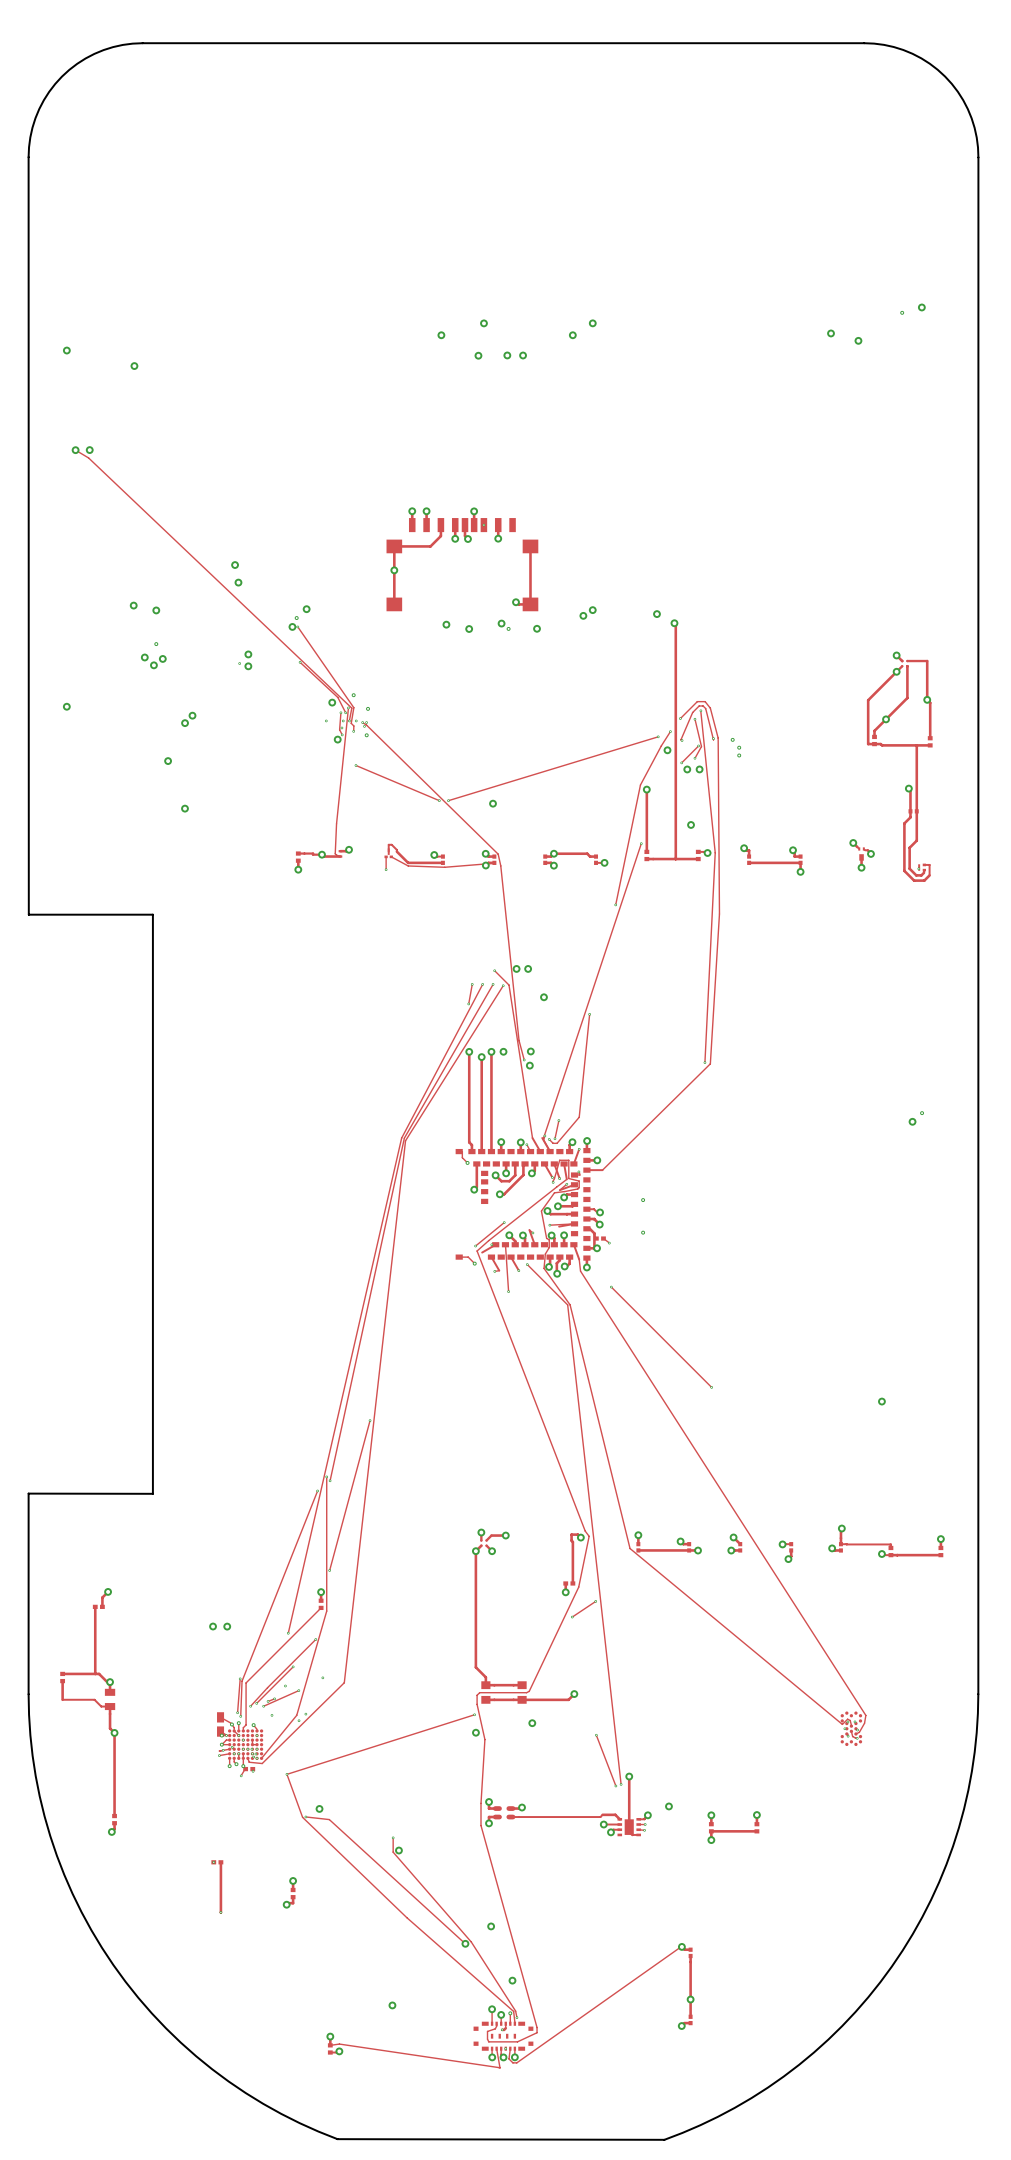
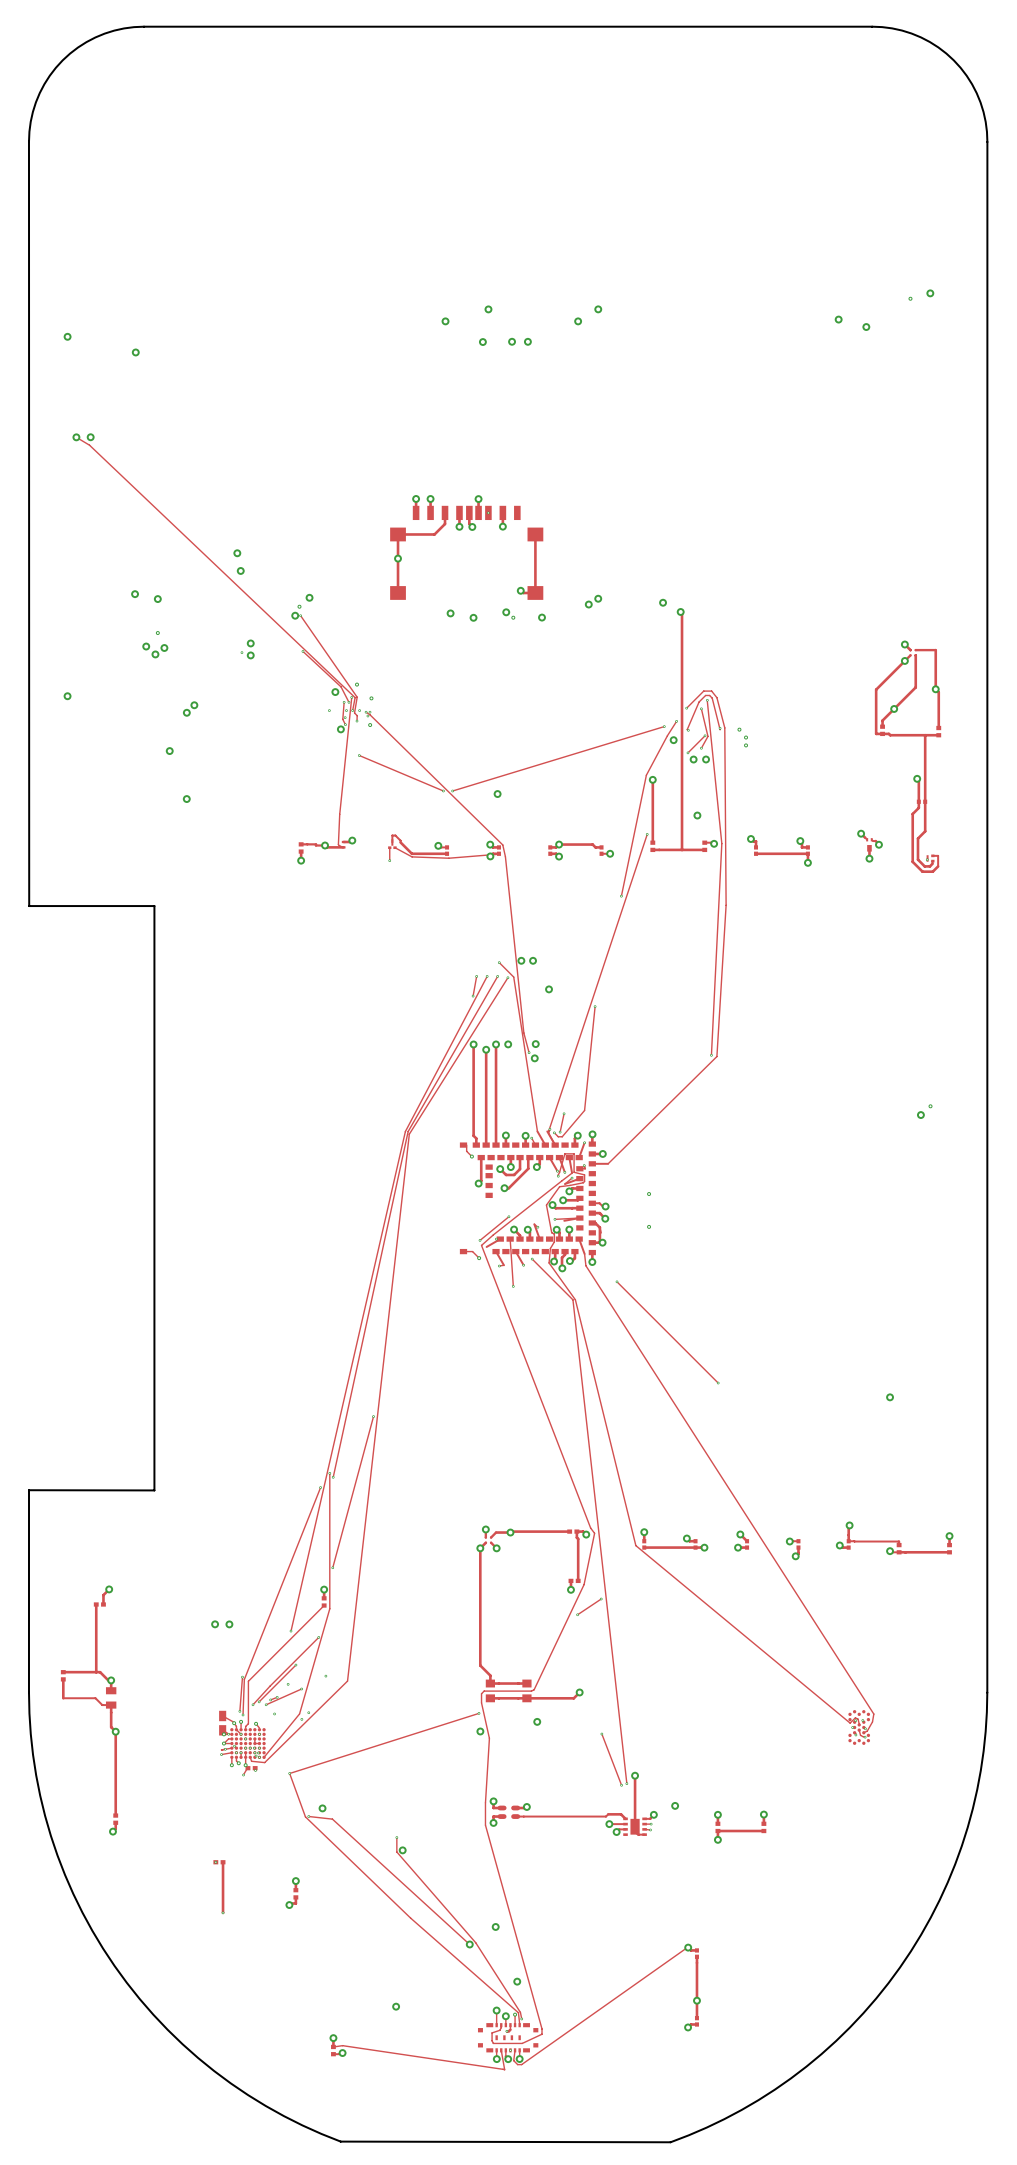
part position: (599, 1238) -> (573, 1531)
track: (603, 1238) (608, 1242) -> none
via: (609, 1243) -> none
track: none -> (511, 1531) (569, 1531)

